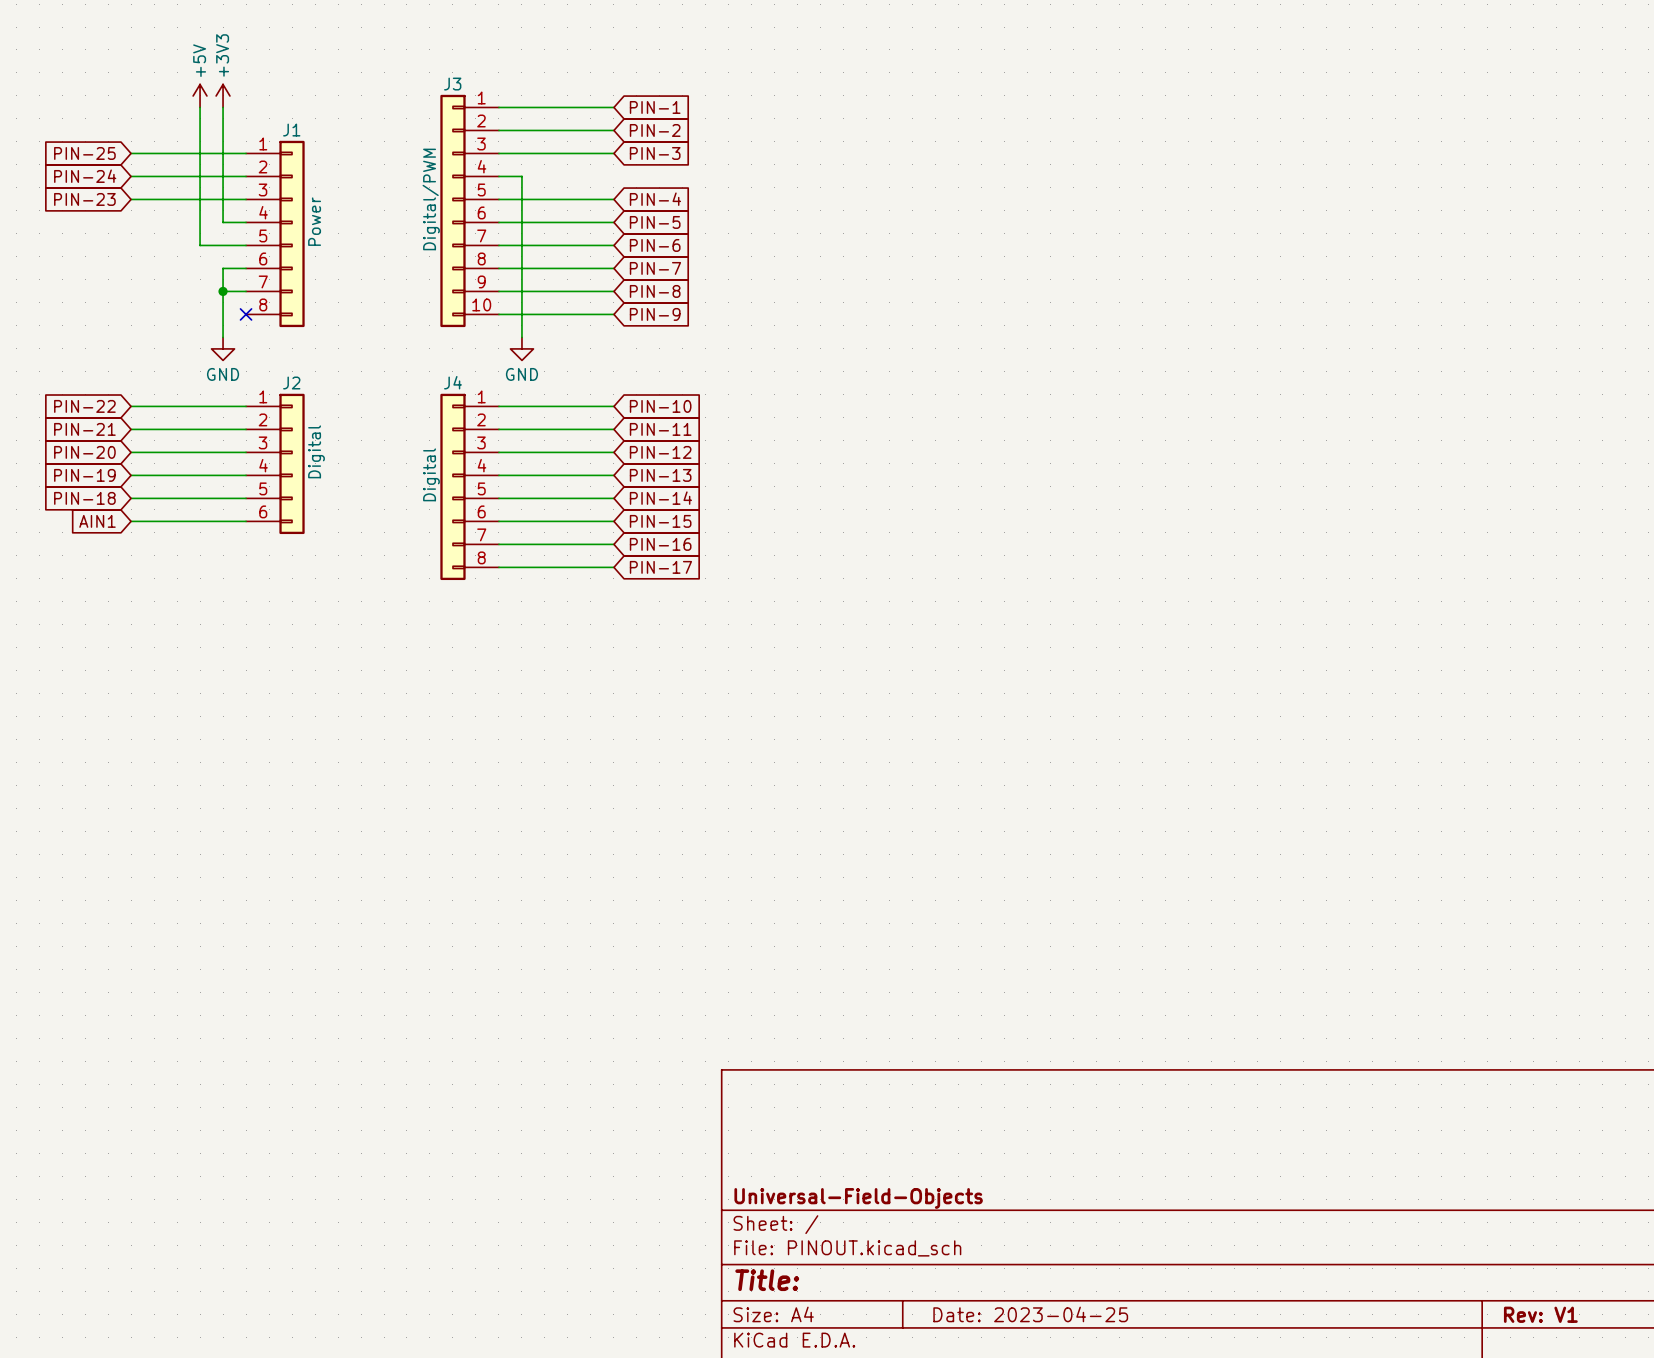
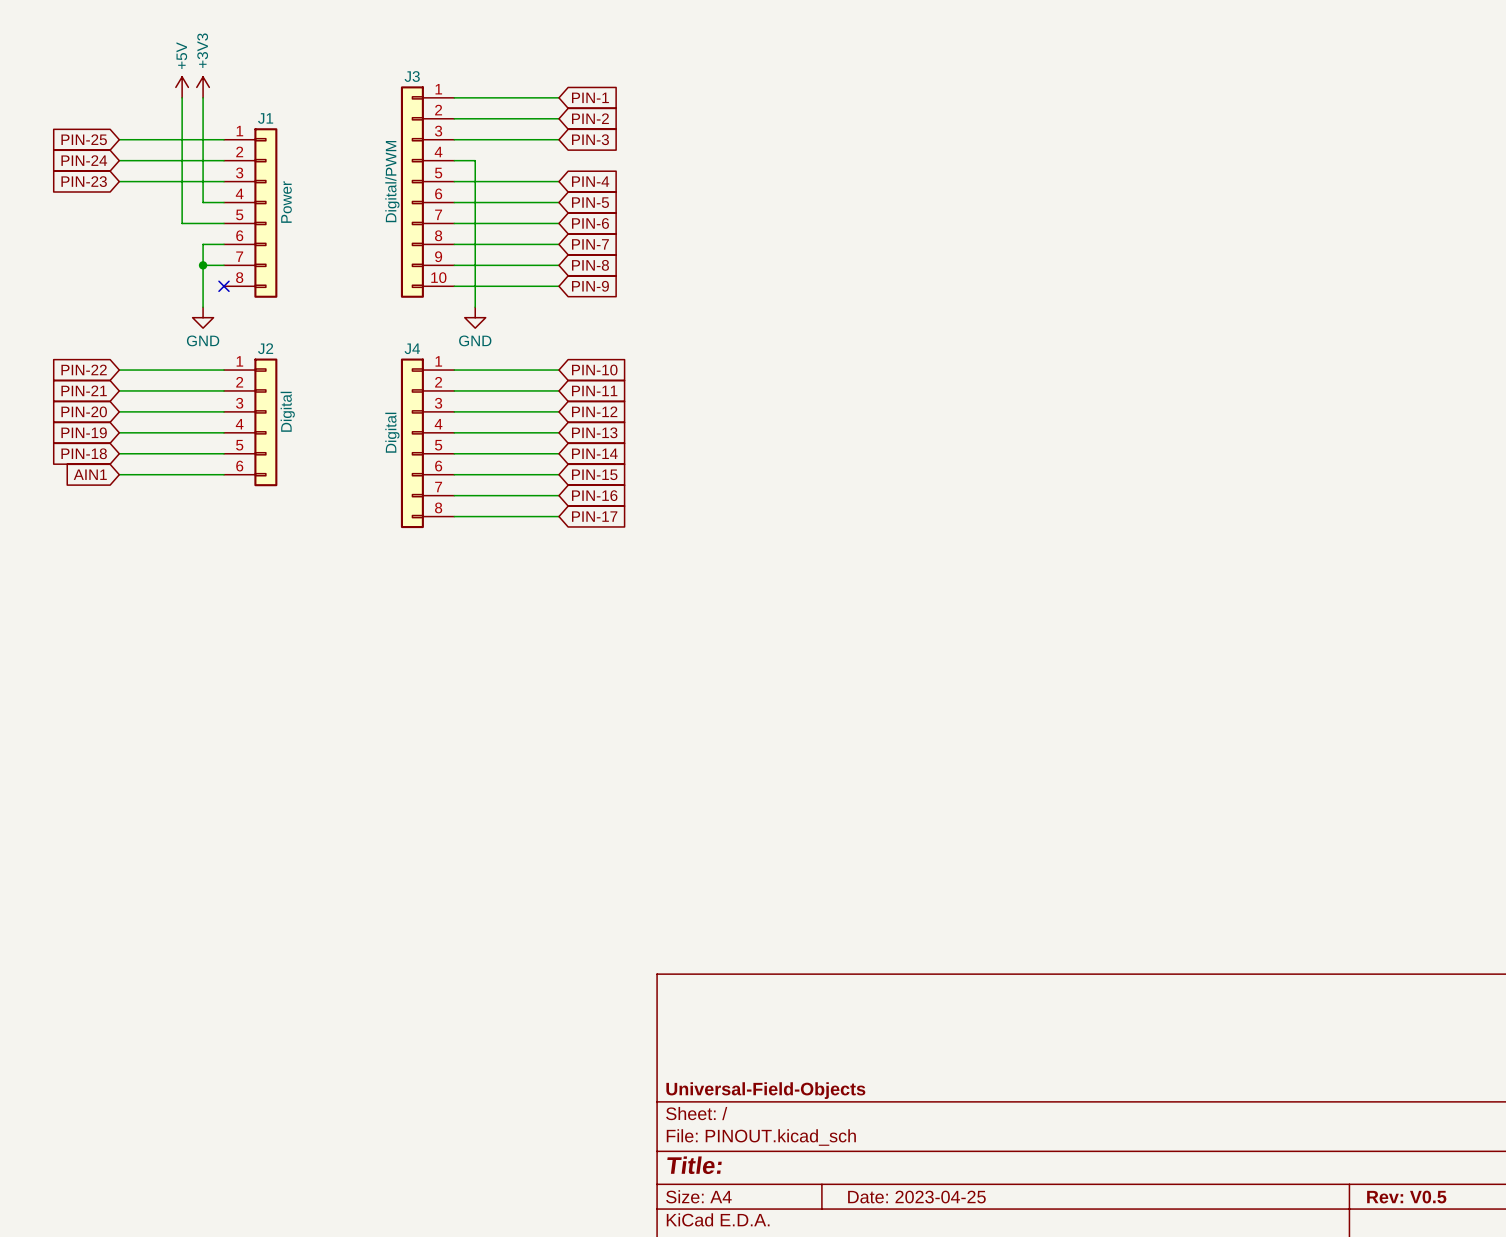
title block: Rev: V1 (1540, 1314) -> Rev: V0.5 (1406, 1197)

